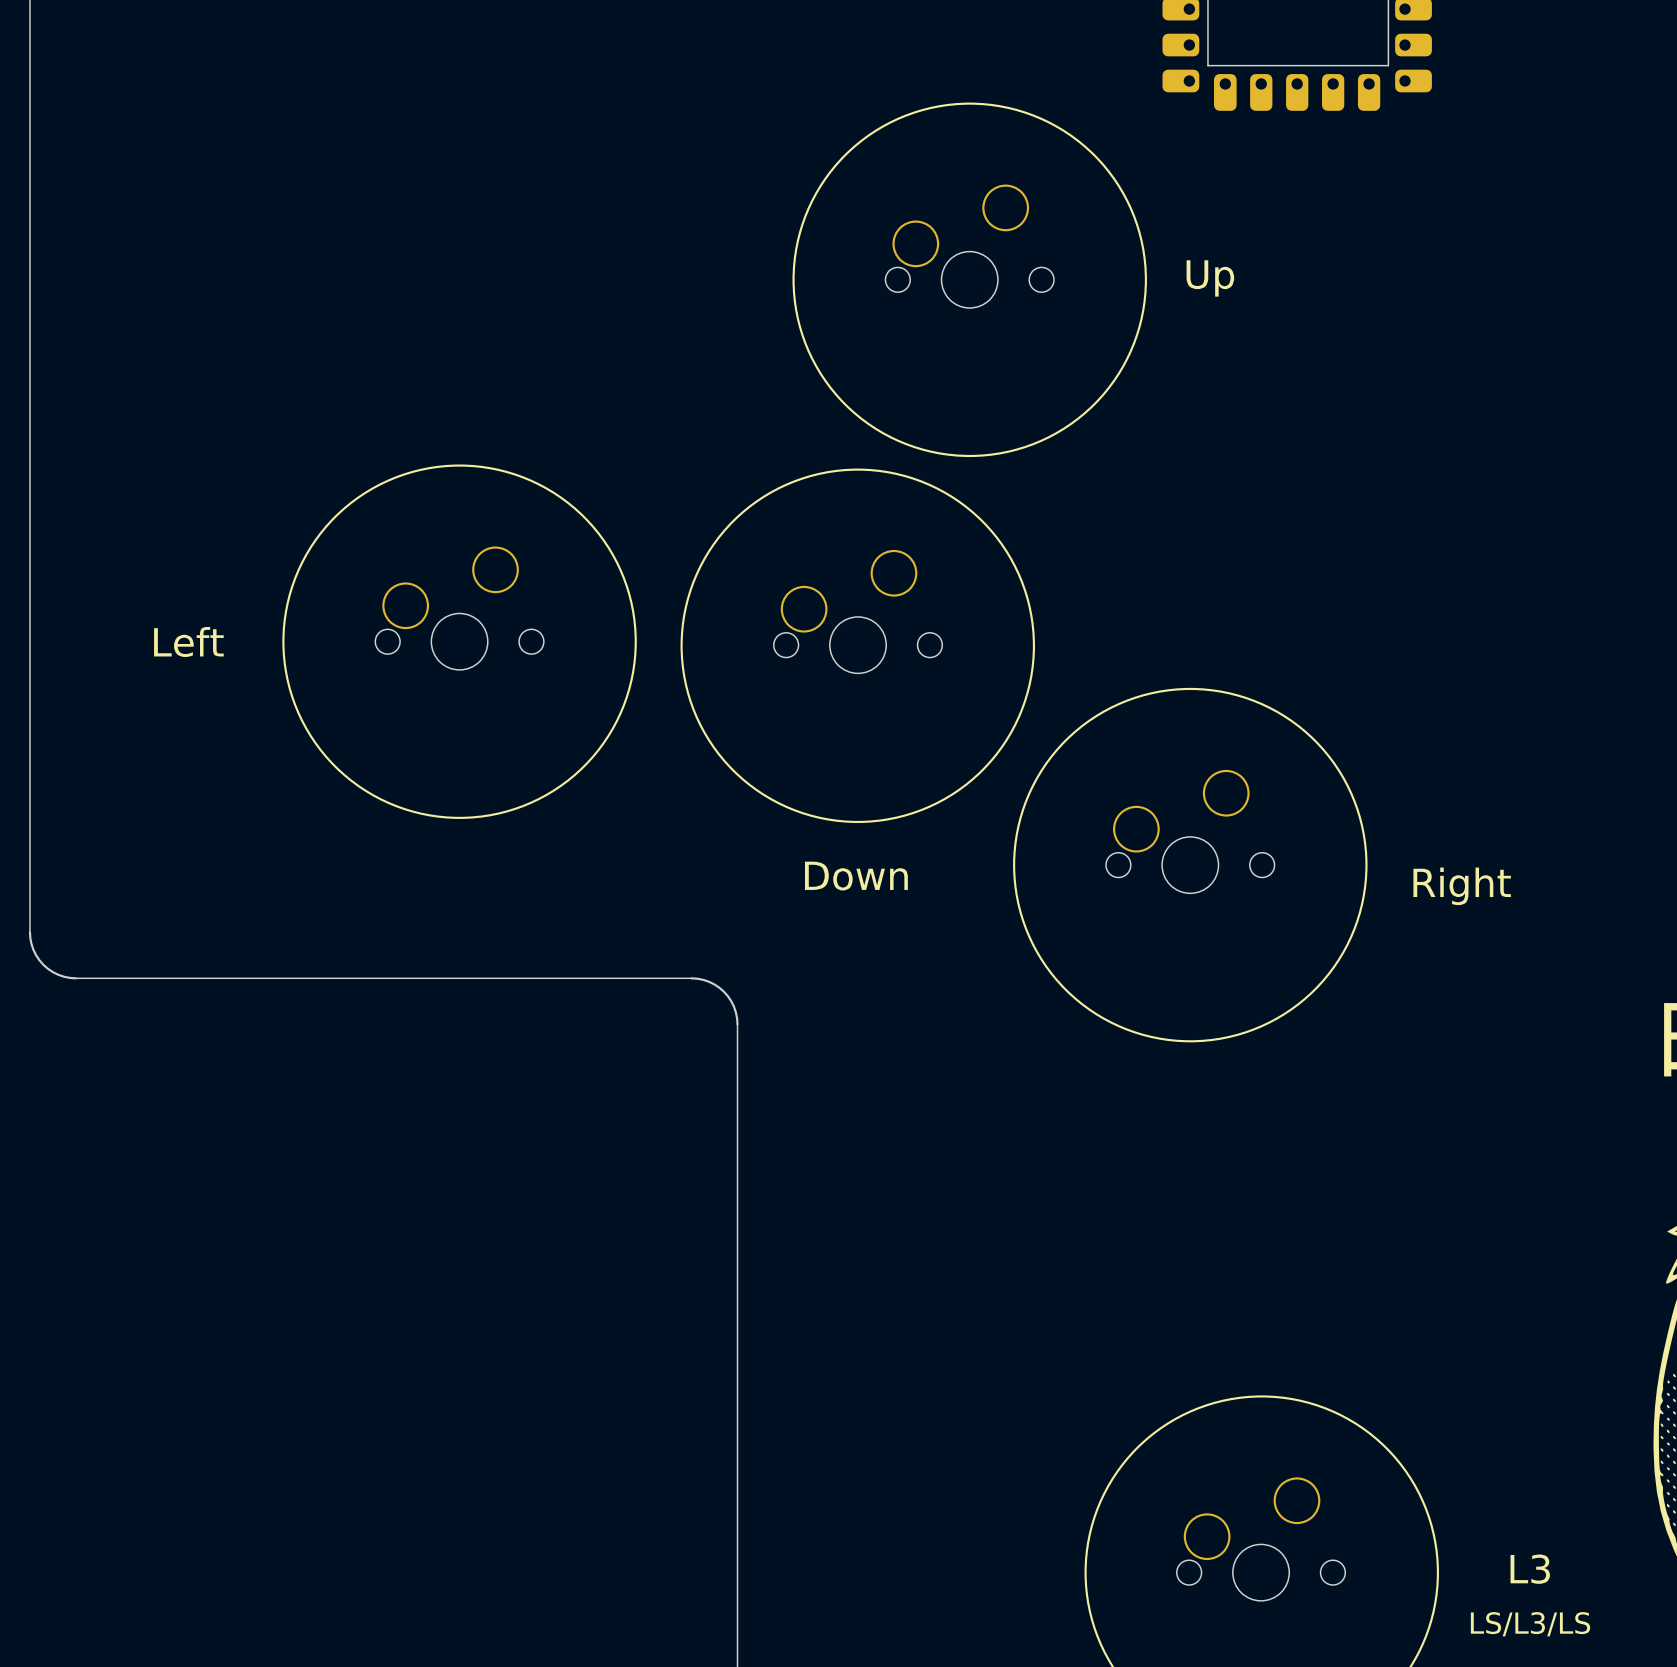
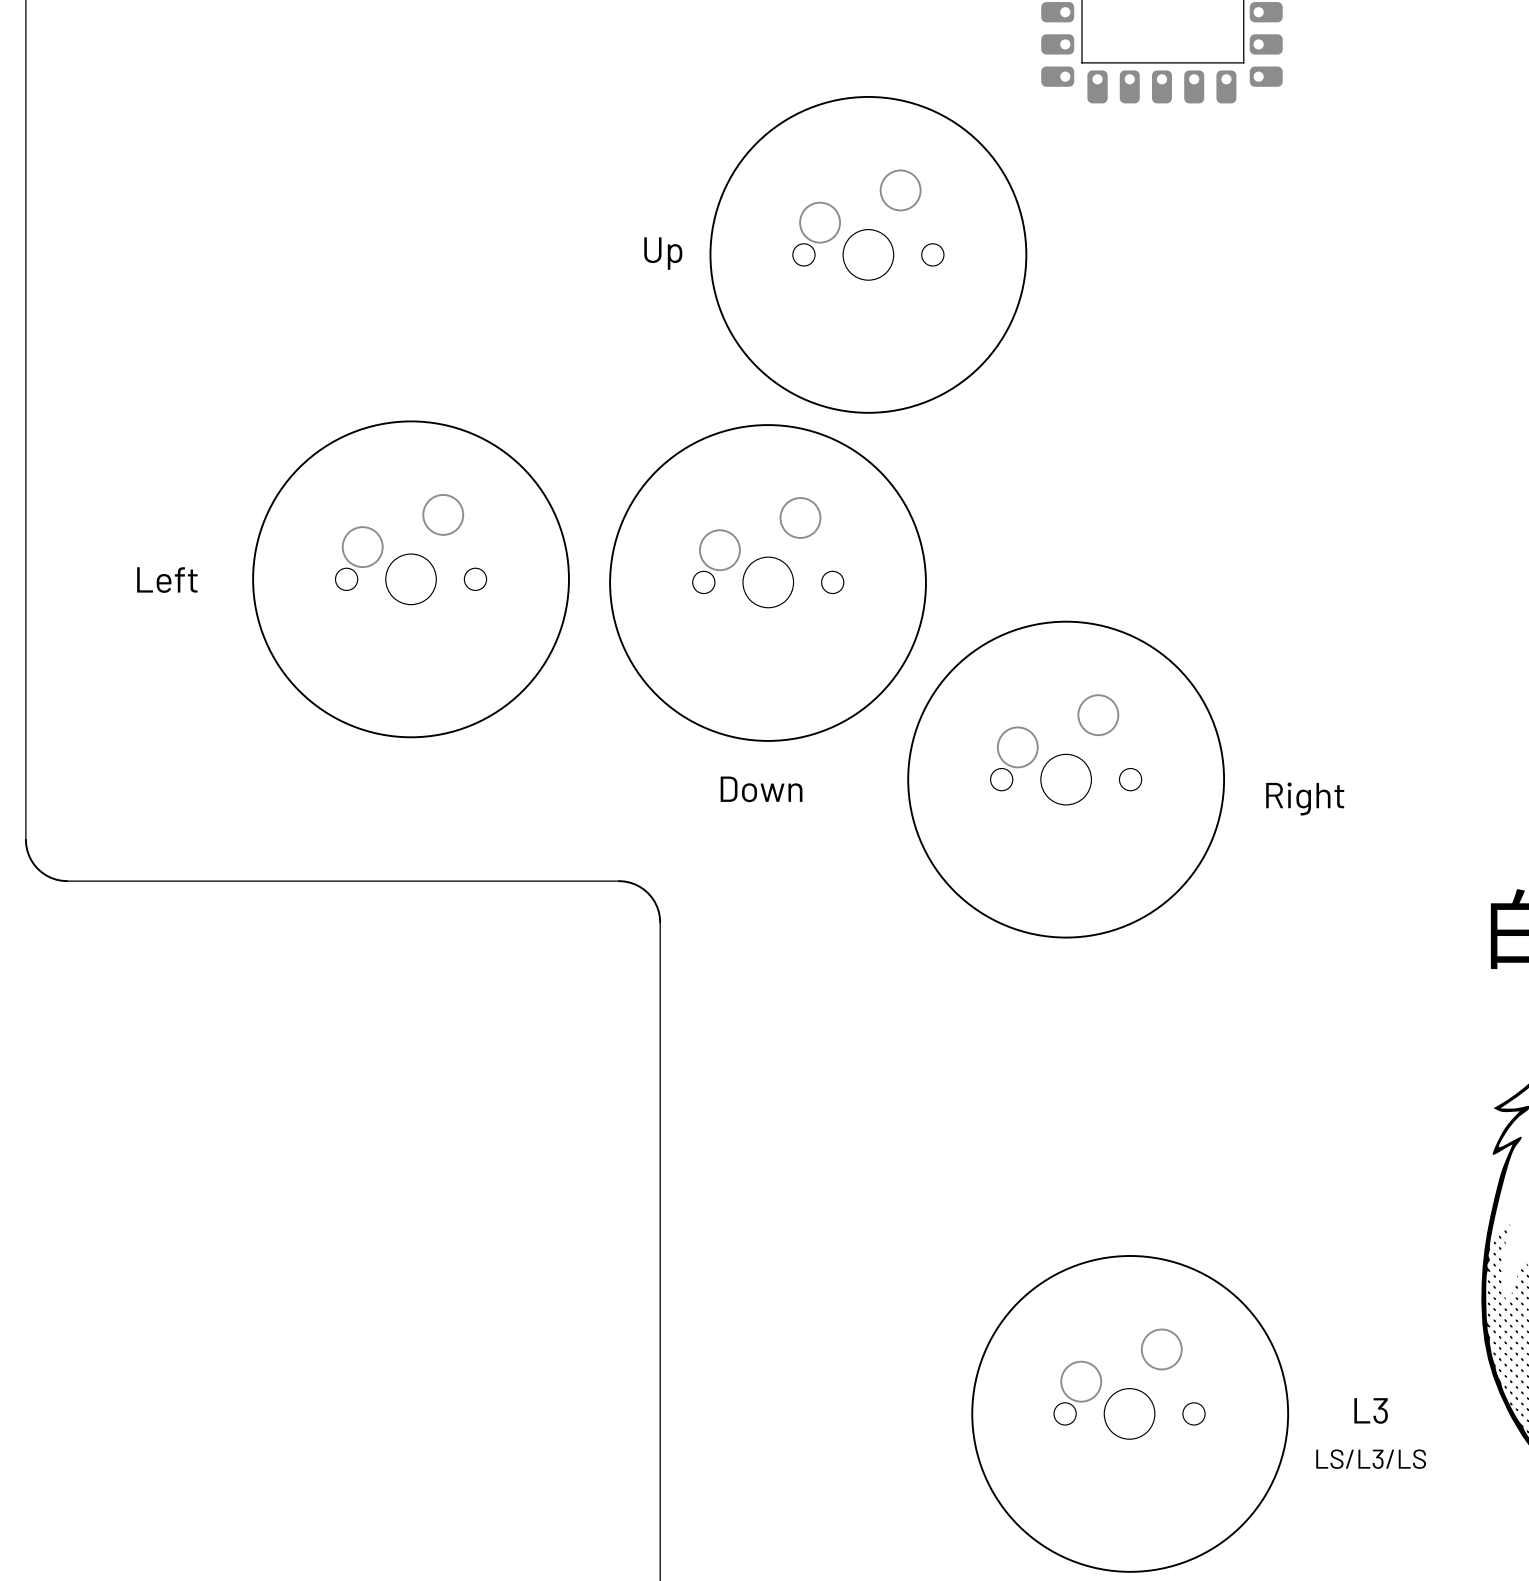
text: none -> Up (663, 253)
text: Up (1210, 278) -> none

